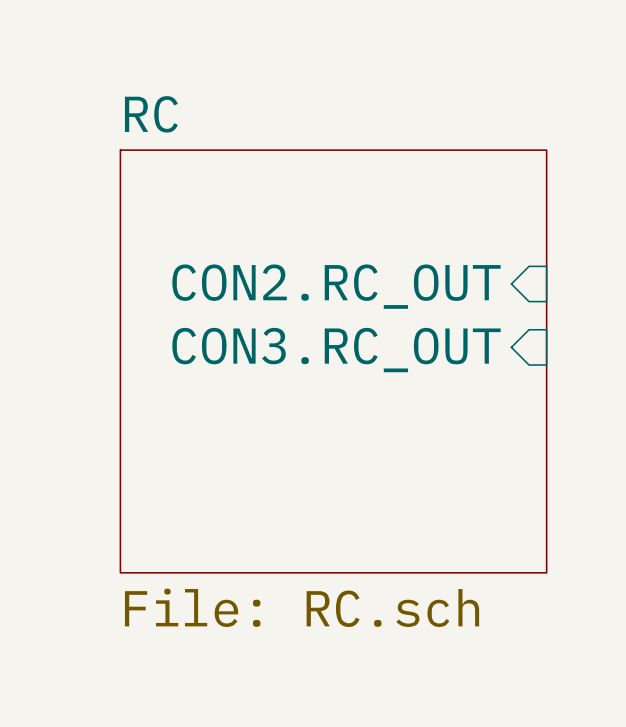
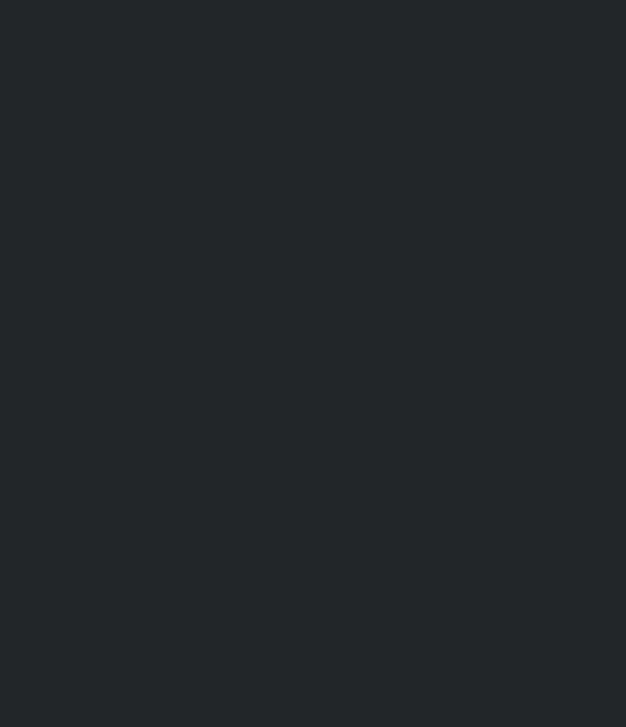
sheet pin: CON2.RC_OUT (336, 286) -> none
sheet pin: CON3.RC_OUT (336, 350) -> none
sheet RC: File: RC.sch (333, 361) -> none

